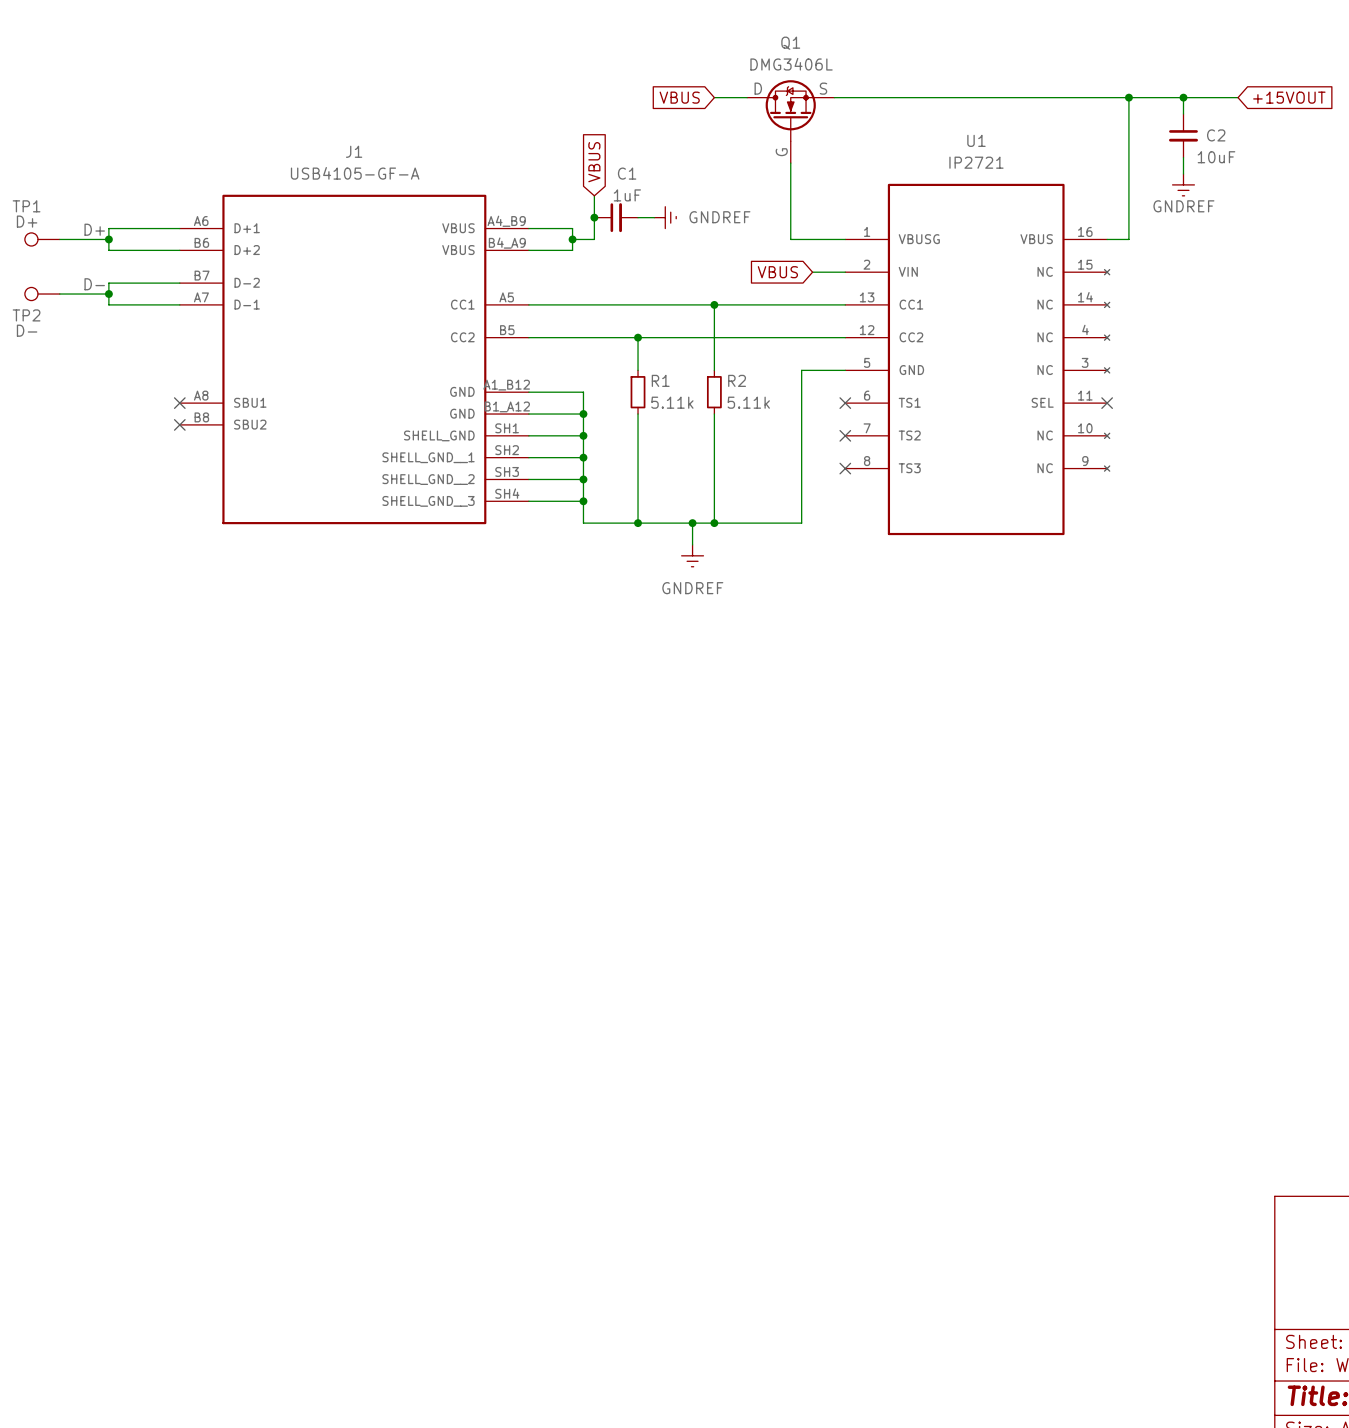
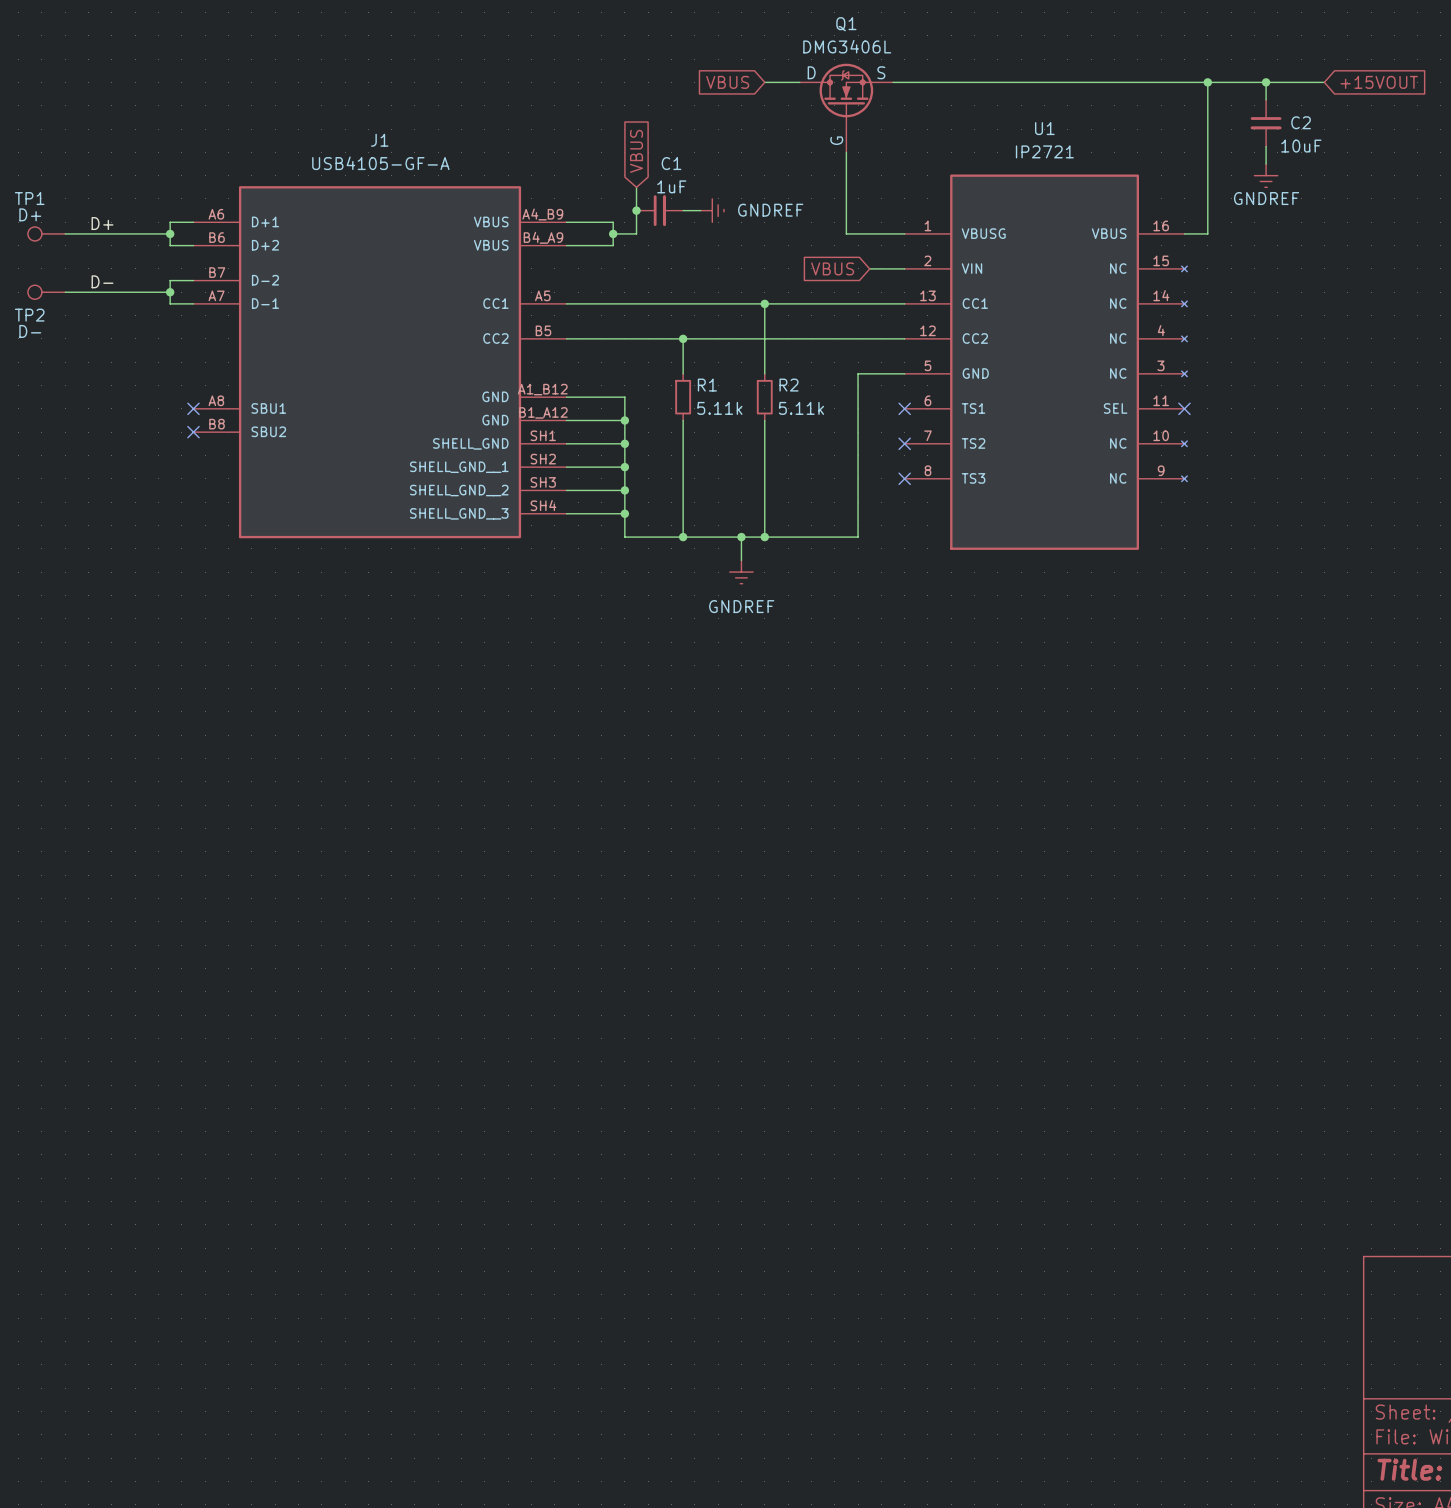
wire: (157, 228) (108, 228) (108, 250) (157, 250) -> (170, 222) (170, 245)
wire: none -> (117, 233) (170, 233)
junction: (108, 239) -> none
junction: none -> (170, 233)
wire: (157, 283) (108, 283) (108, 304) (157, 304) -> (170, 280) (170, 303)
wire: none -> (117, 292) (170, 292)
junction: (108, 294) -> none
junction: none -> (170, 292)

